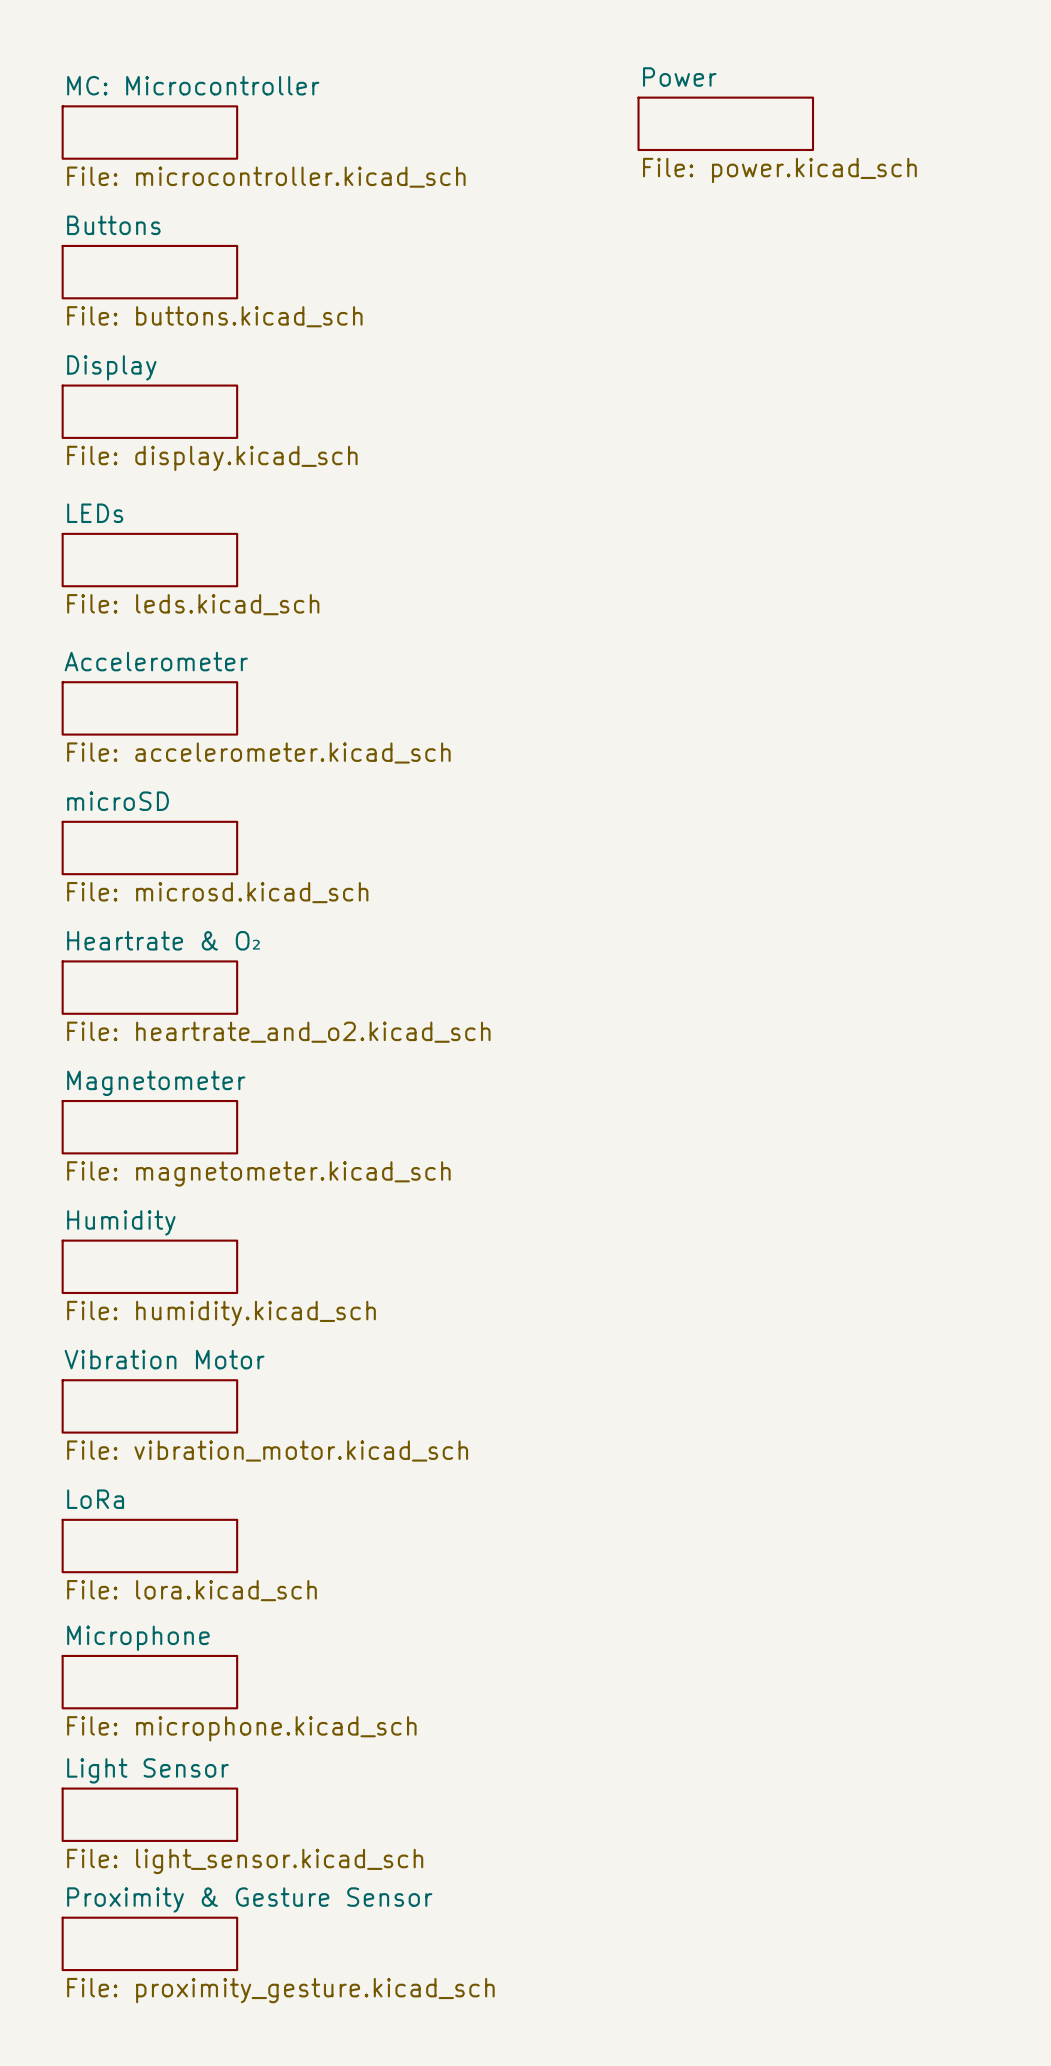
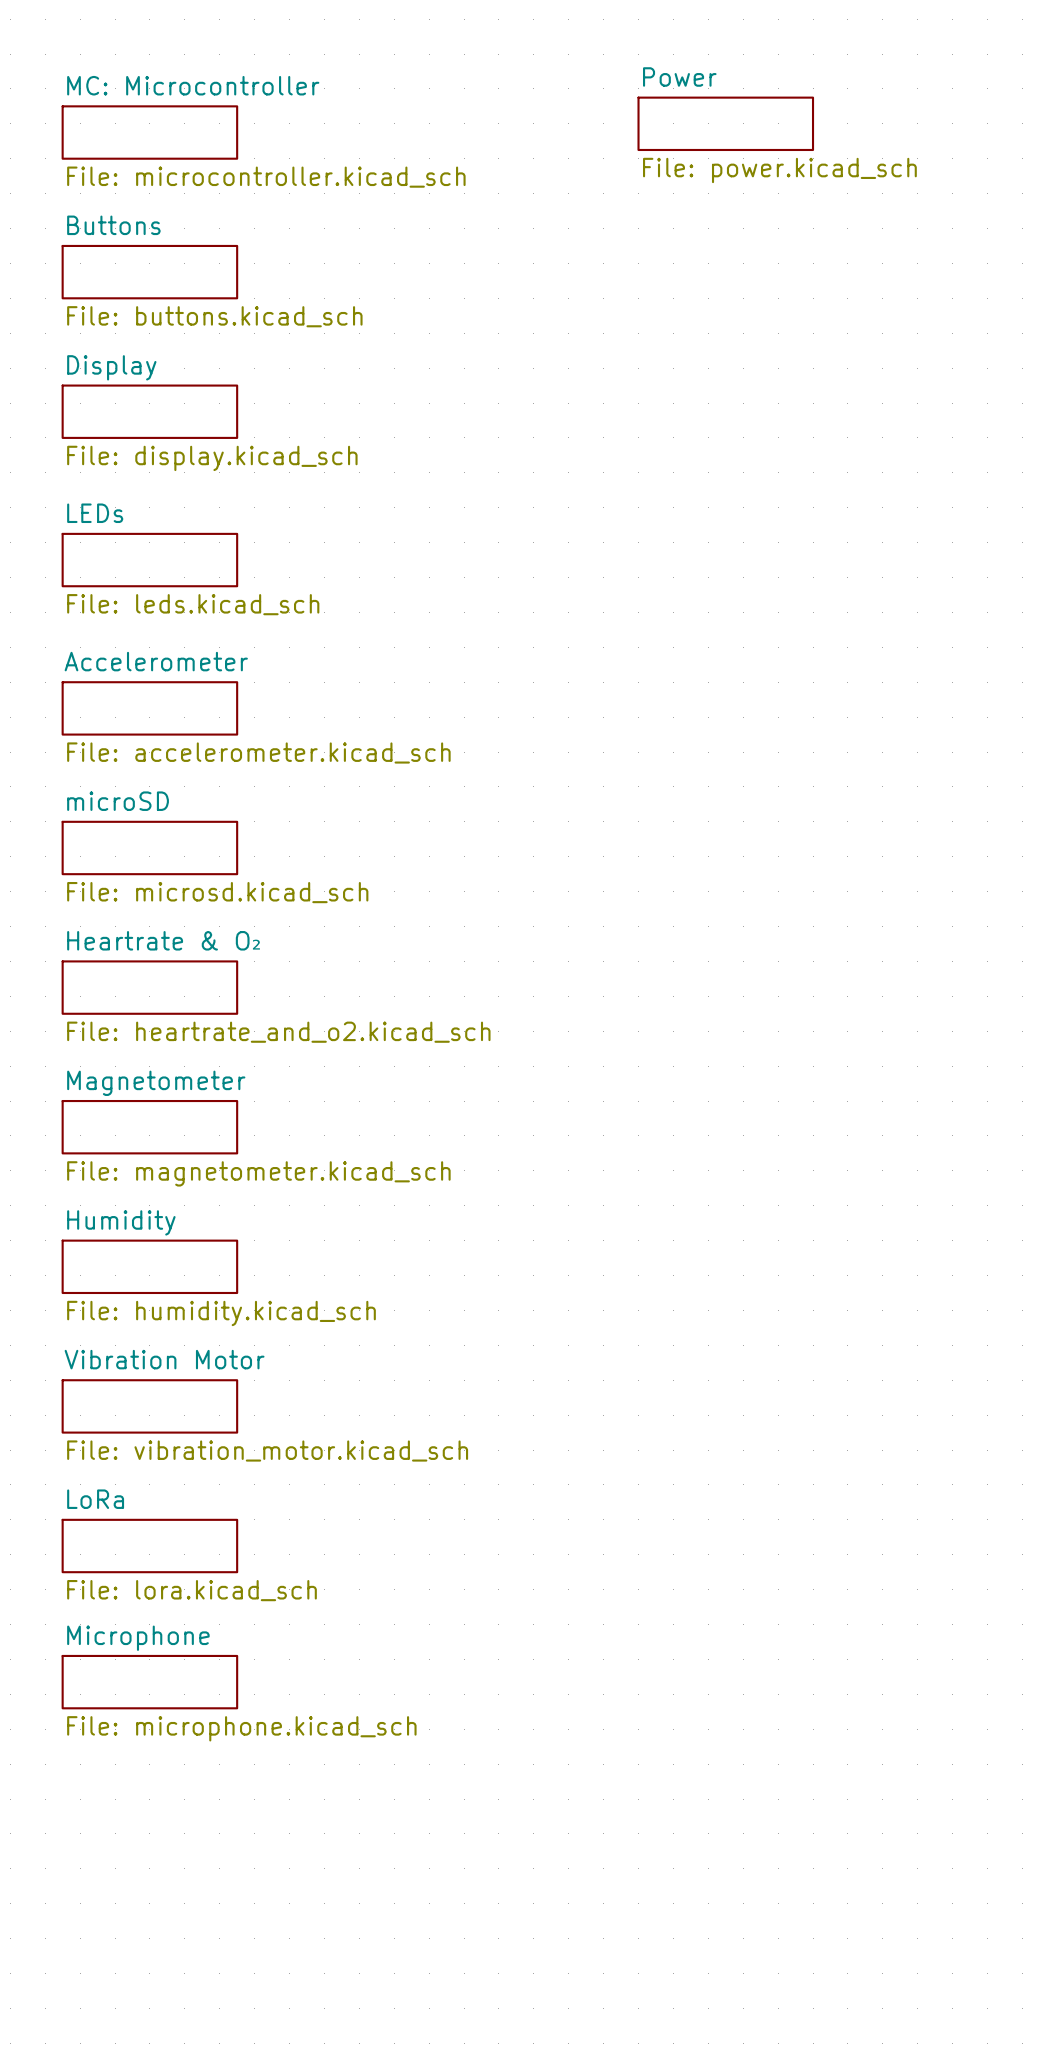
sheet Light Sensor: File: light_sensor.kicad_sch (149, 1814) -> none
sheet Proximity & Gesture Sensor: File: proximity_gesture.kicad_sch (149, 1943) -> none

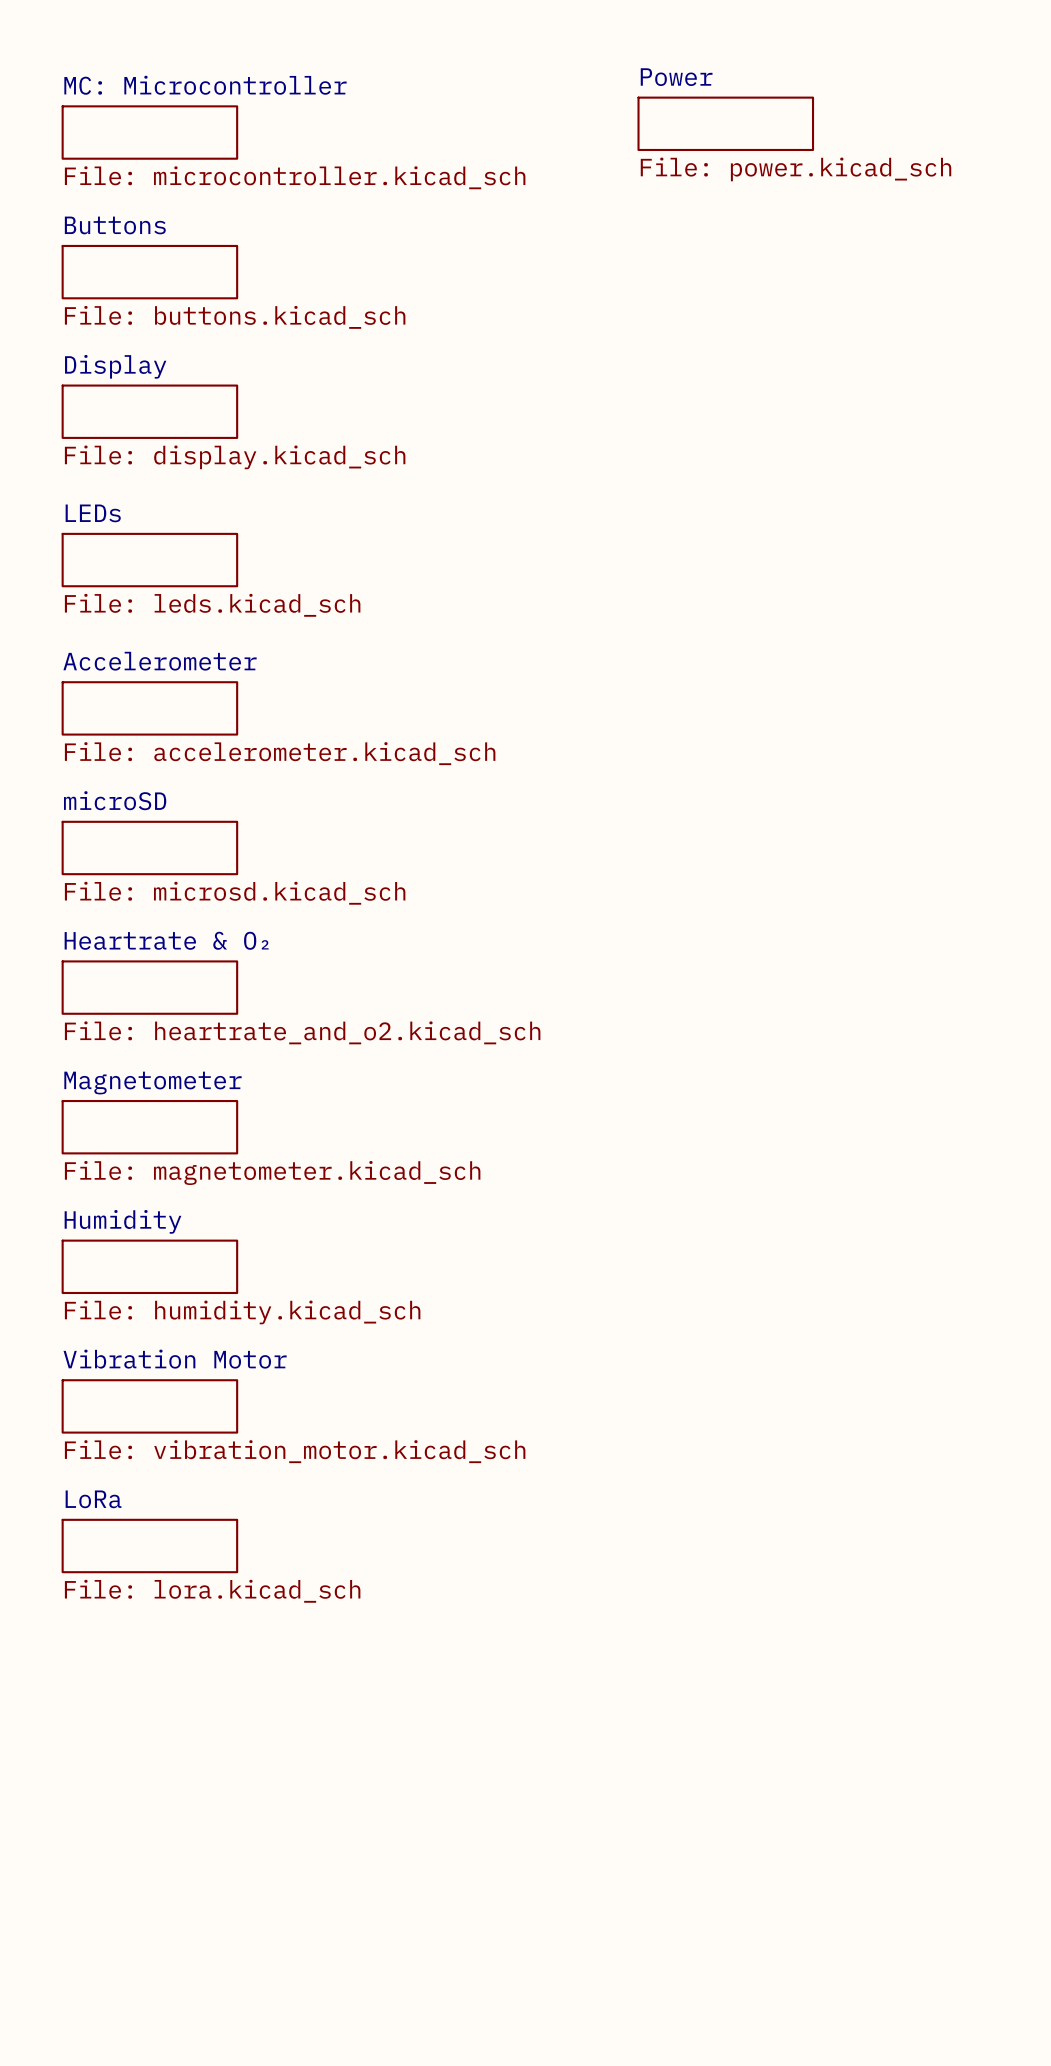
sheet Microphone: File: microphone.kicad_sch (149, 1682) -> none

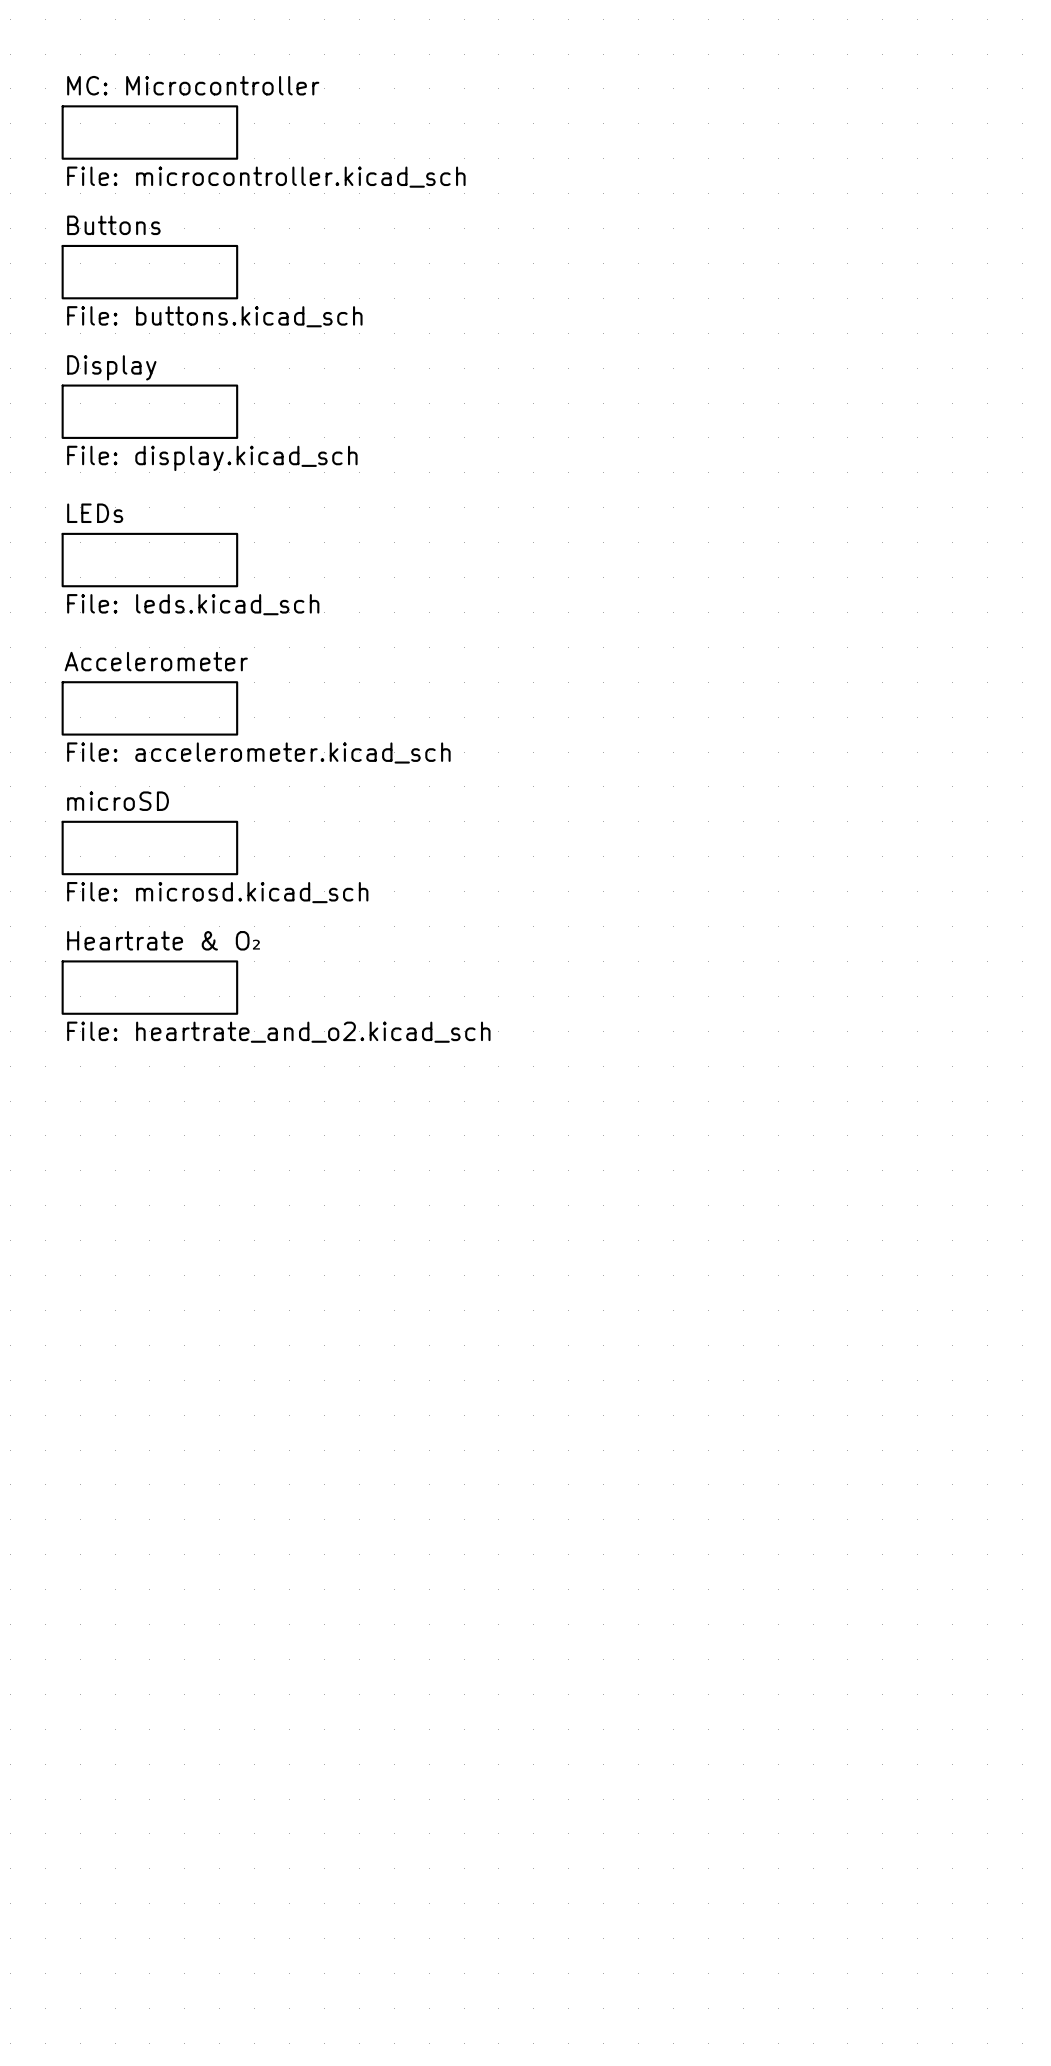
sheet Power: File: power.kicad_sch (725, 123) -> none
sheet Magnetometer: File: magnetometer.kicad_sch (149, 1127) -> none
sheet Humidity: File: humidity.kicad_sch (149, 1266) -> none
sheet Vibration Motor: File: vibration_motor.kicad_sch (149, 1406) -> none
sheet LoRa: File: lora.kicad_sch (149, 1546) -> none

